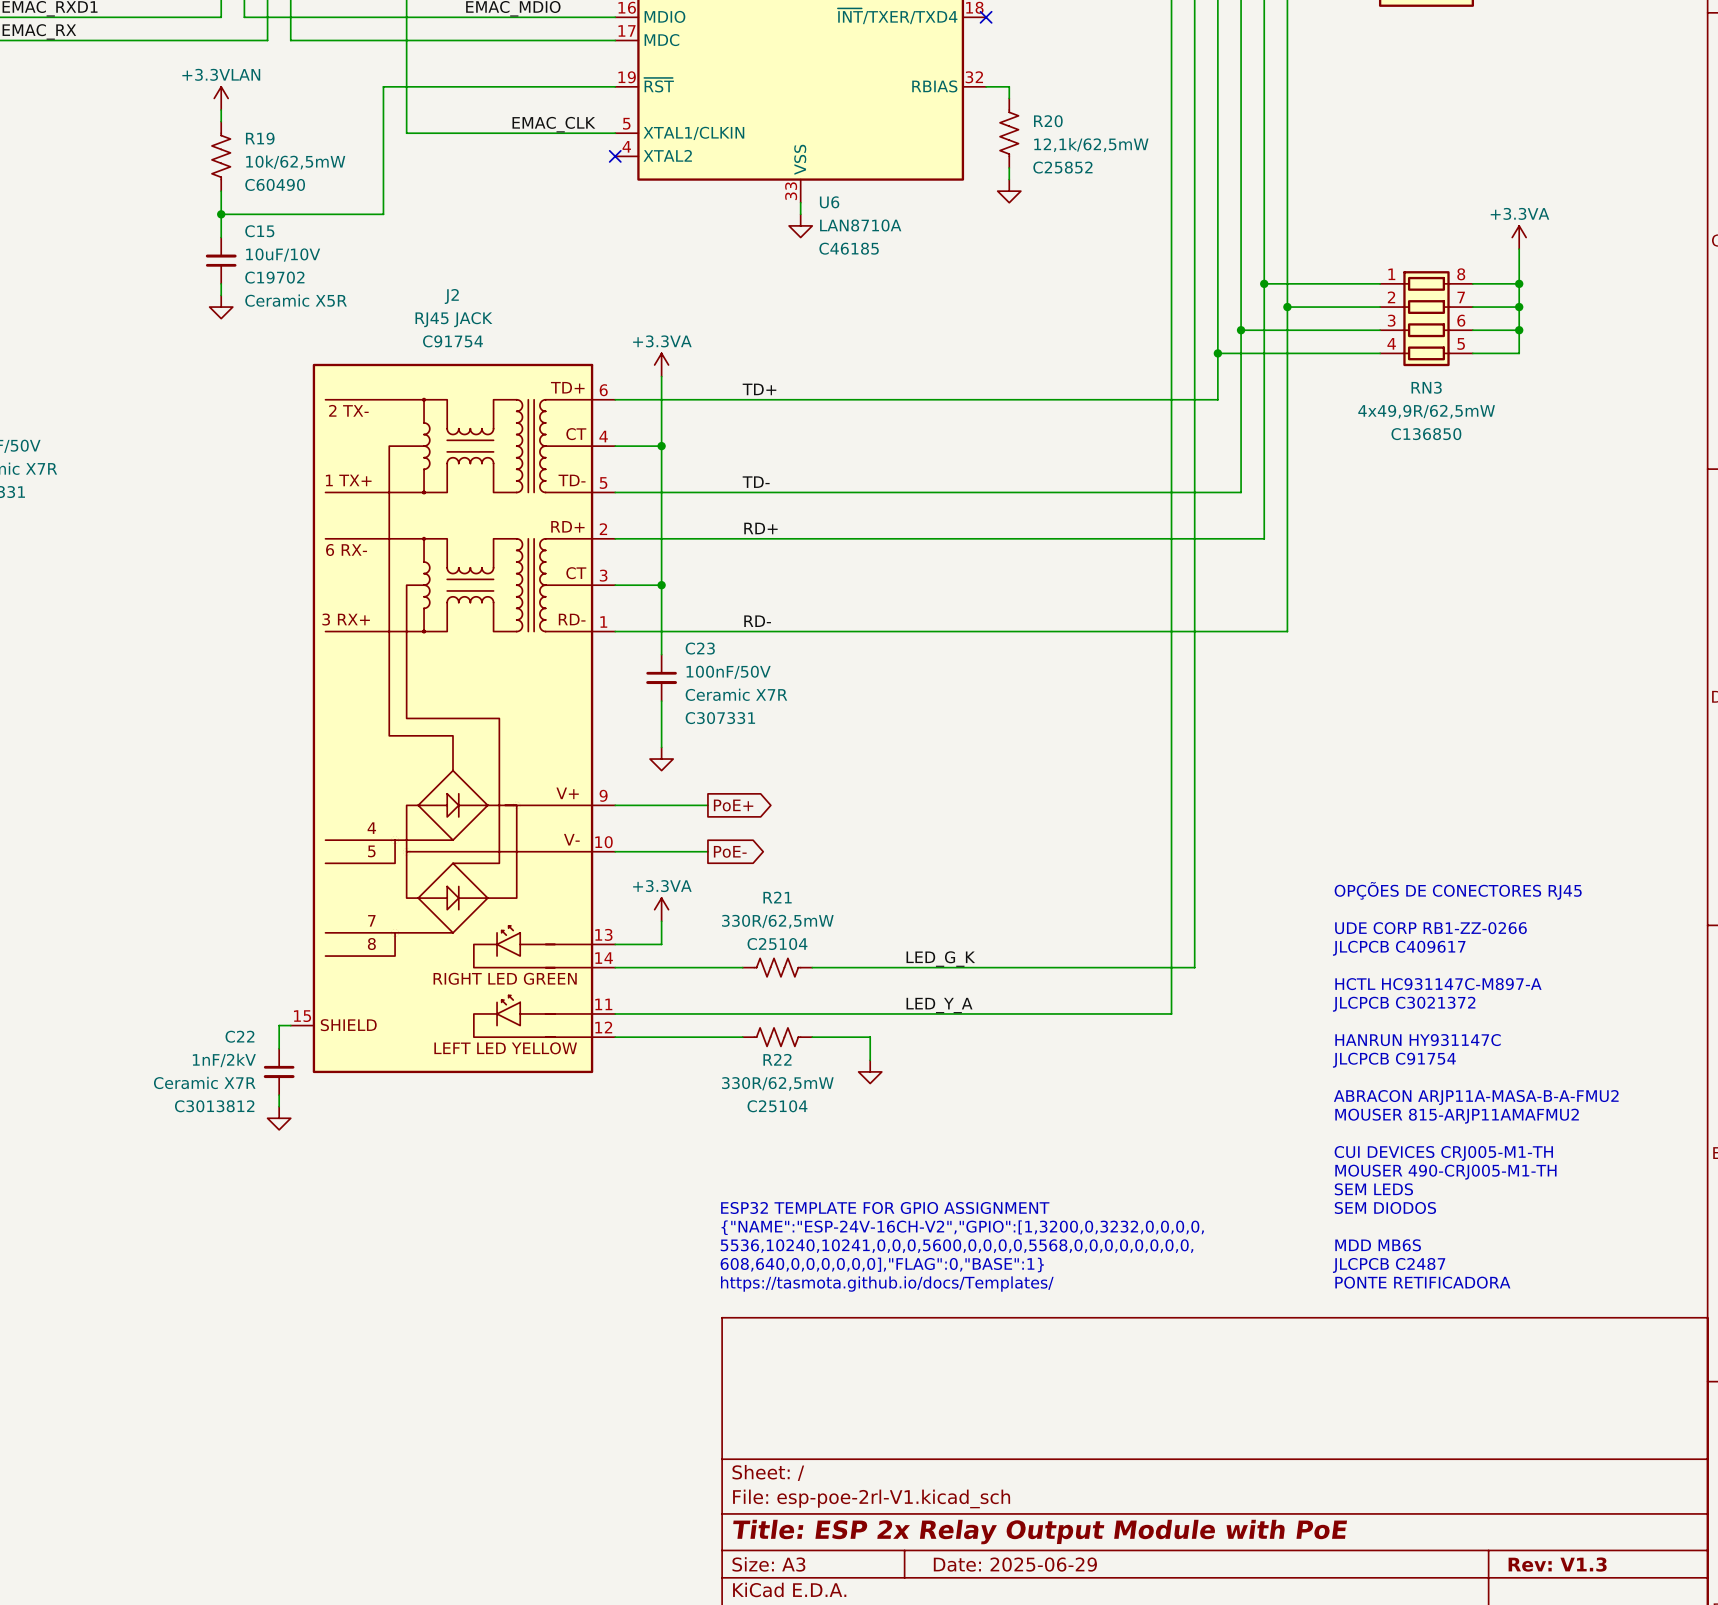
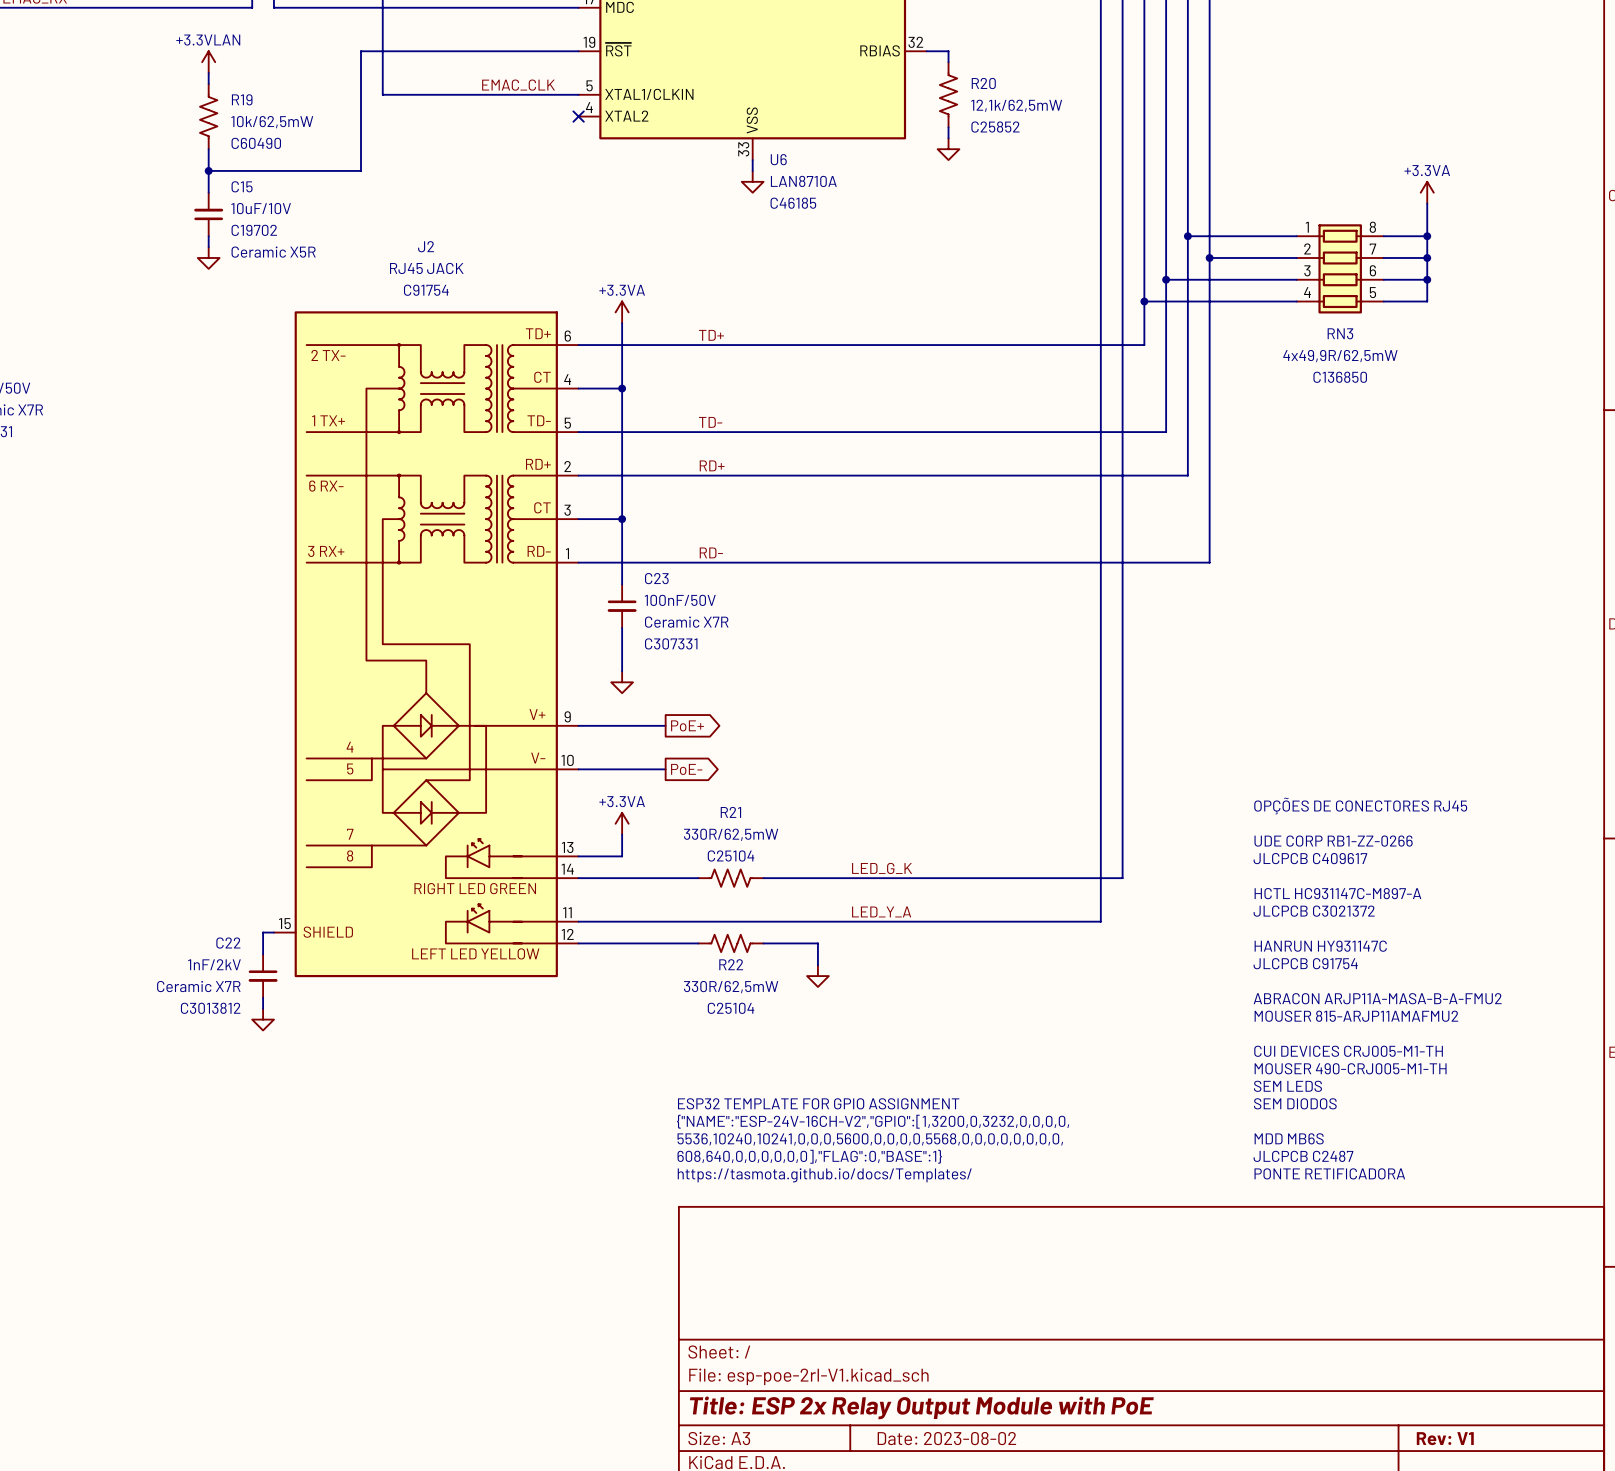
title block: Date: 2025-06-29 (1015, 1564) -> Date: 2023-08-02 (946, 1438)
title block: Rev: V1.3 (1557, 1564) -> Rev: V1 (1445, 1438)

